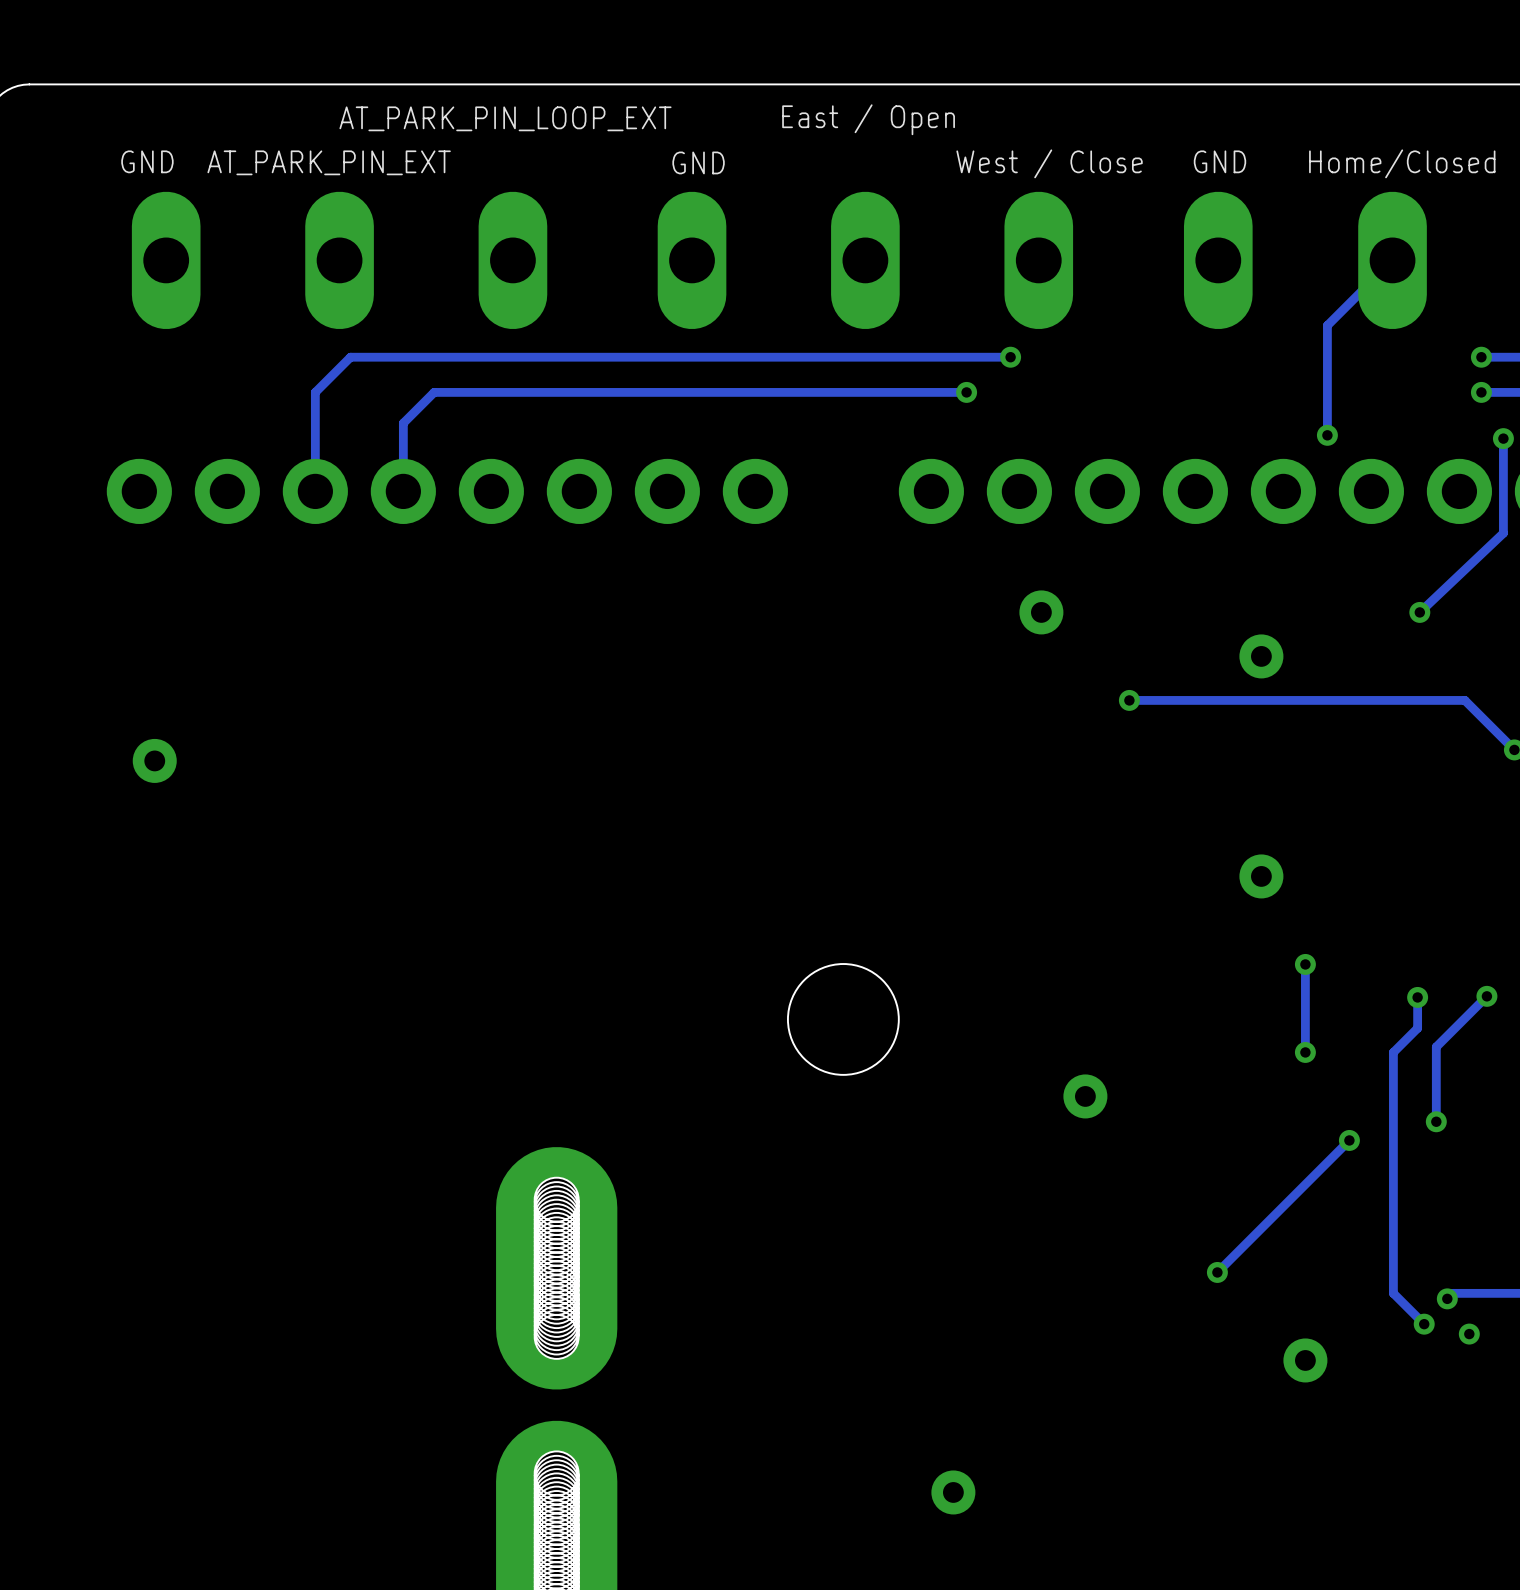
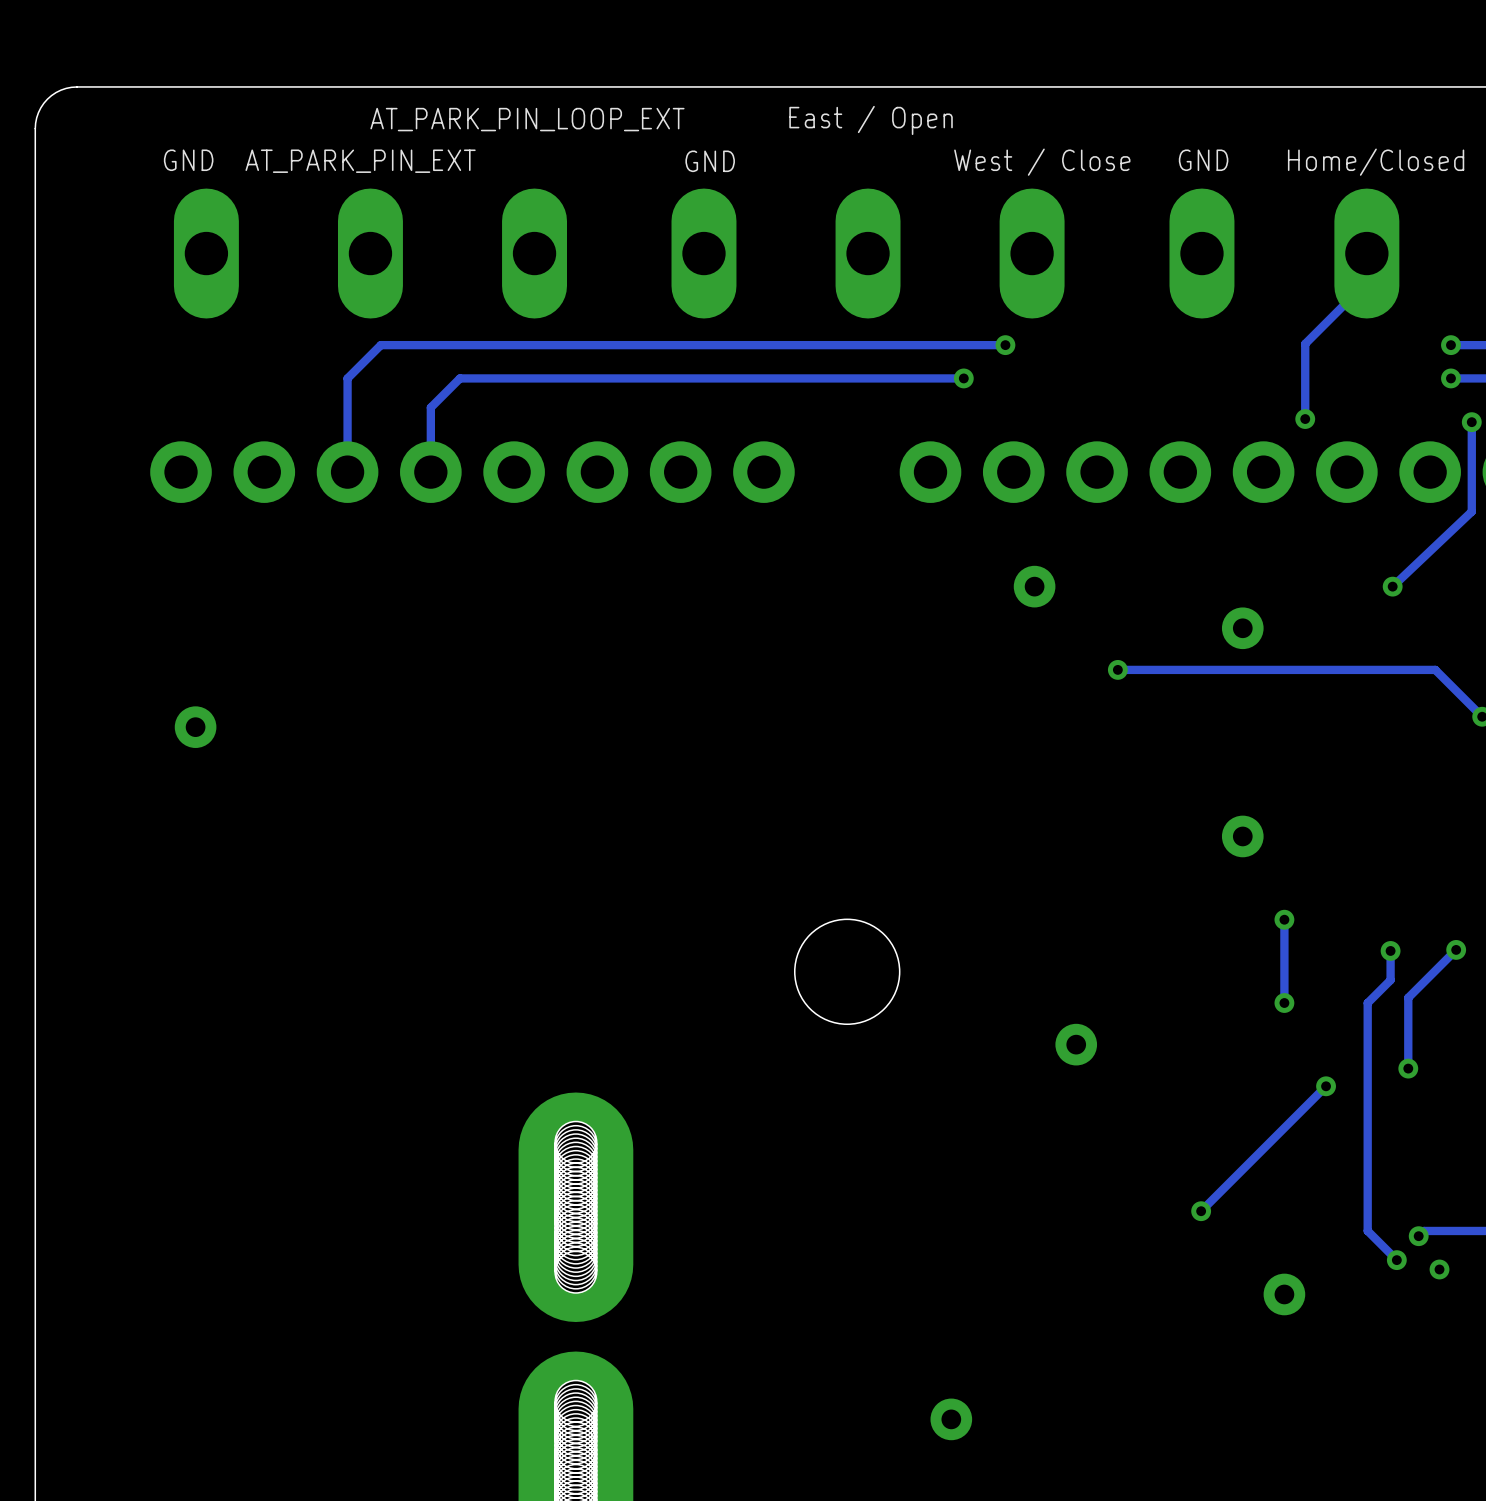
track: (1392, 260) (1327, 325) (1327, 355) -> (1385, 263) (1305, 343)

